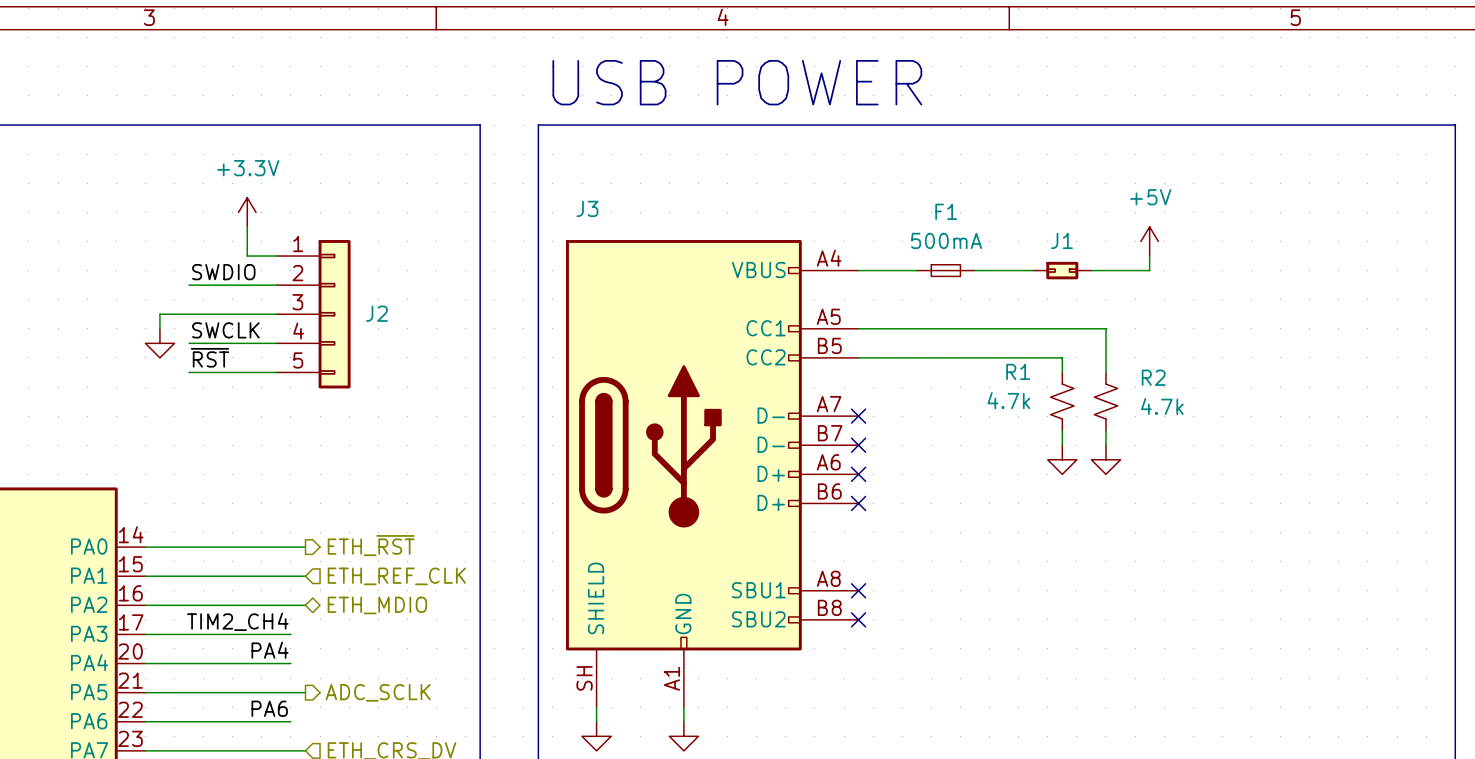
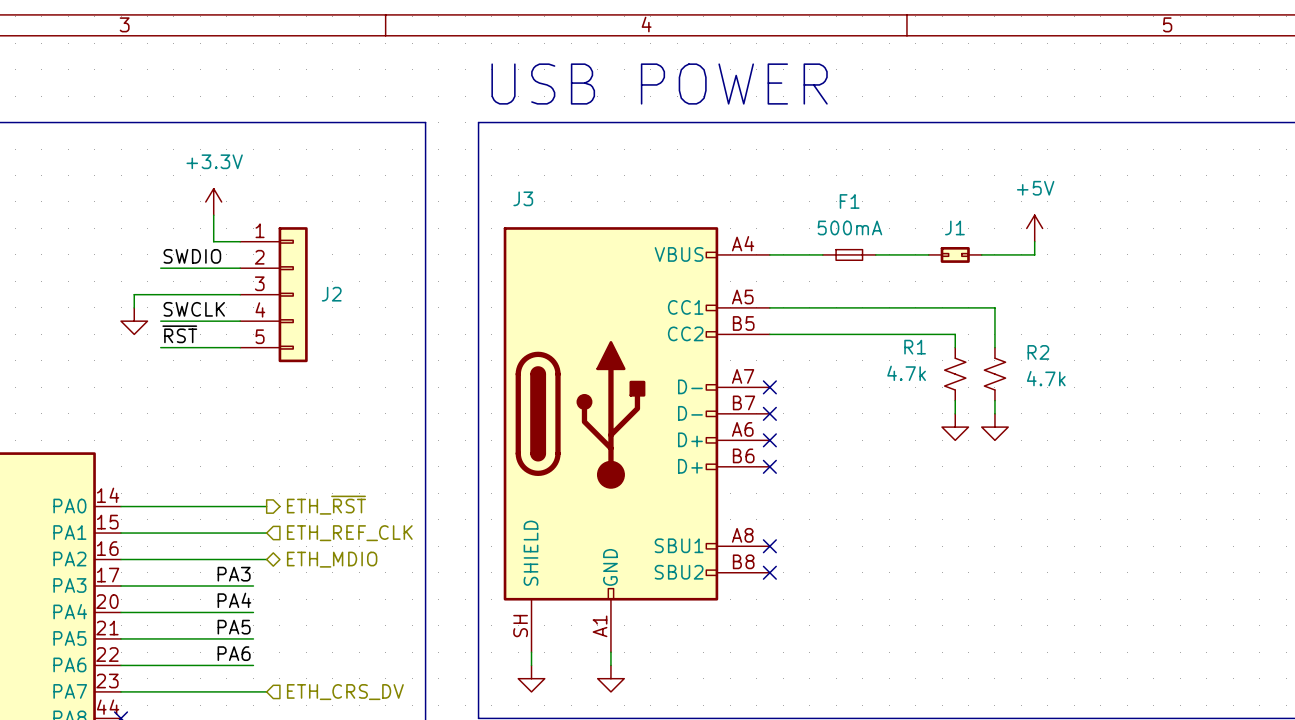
label: TIM2_CH4 (237, 621) -> PA3 (234, 574)
label: none -> PA5 (234, 627)
wire: (290, 692) (305, 692) -> none
hierarchical label: ADC_SCLK (378, 692) -> none

